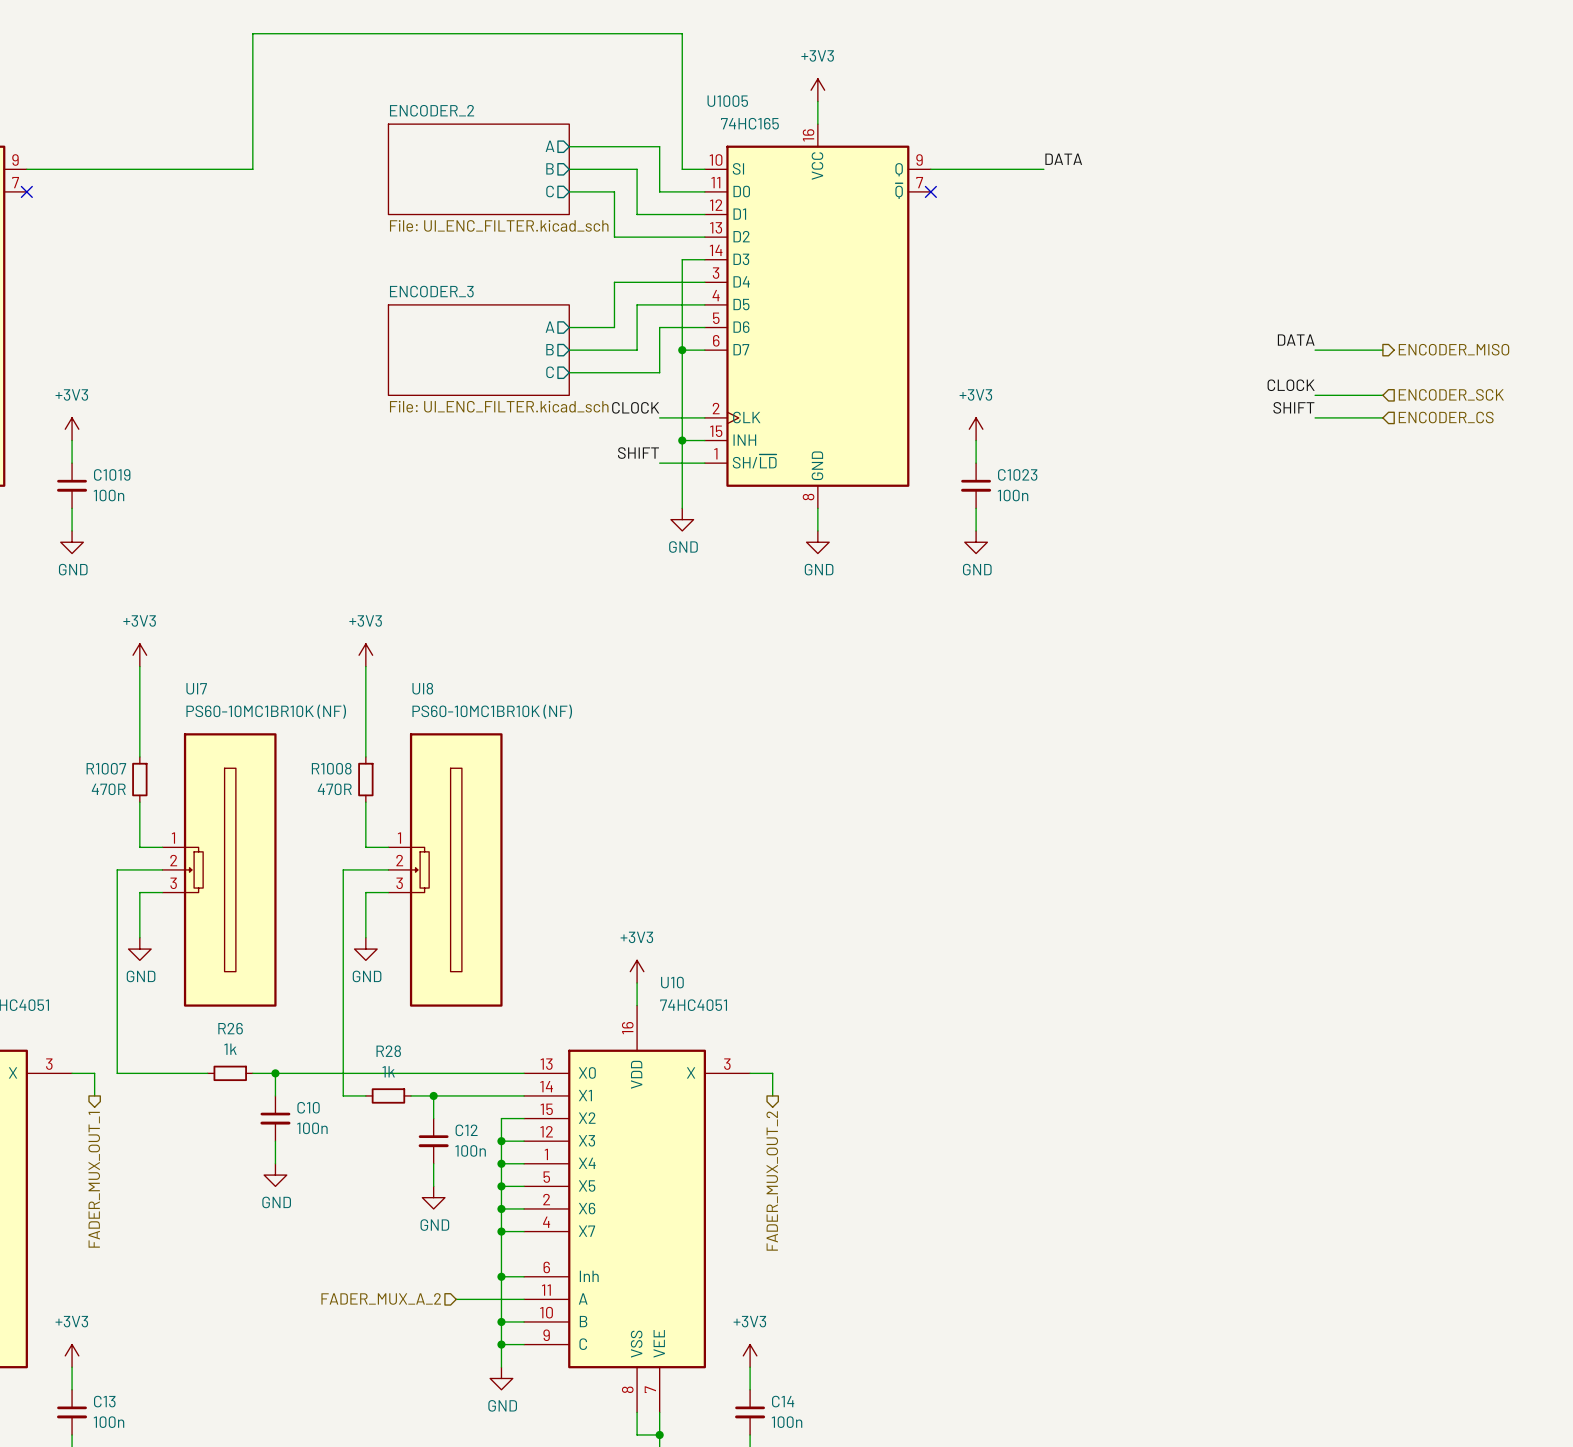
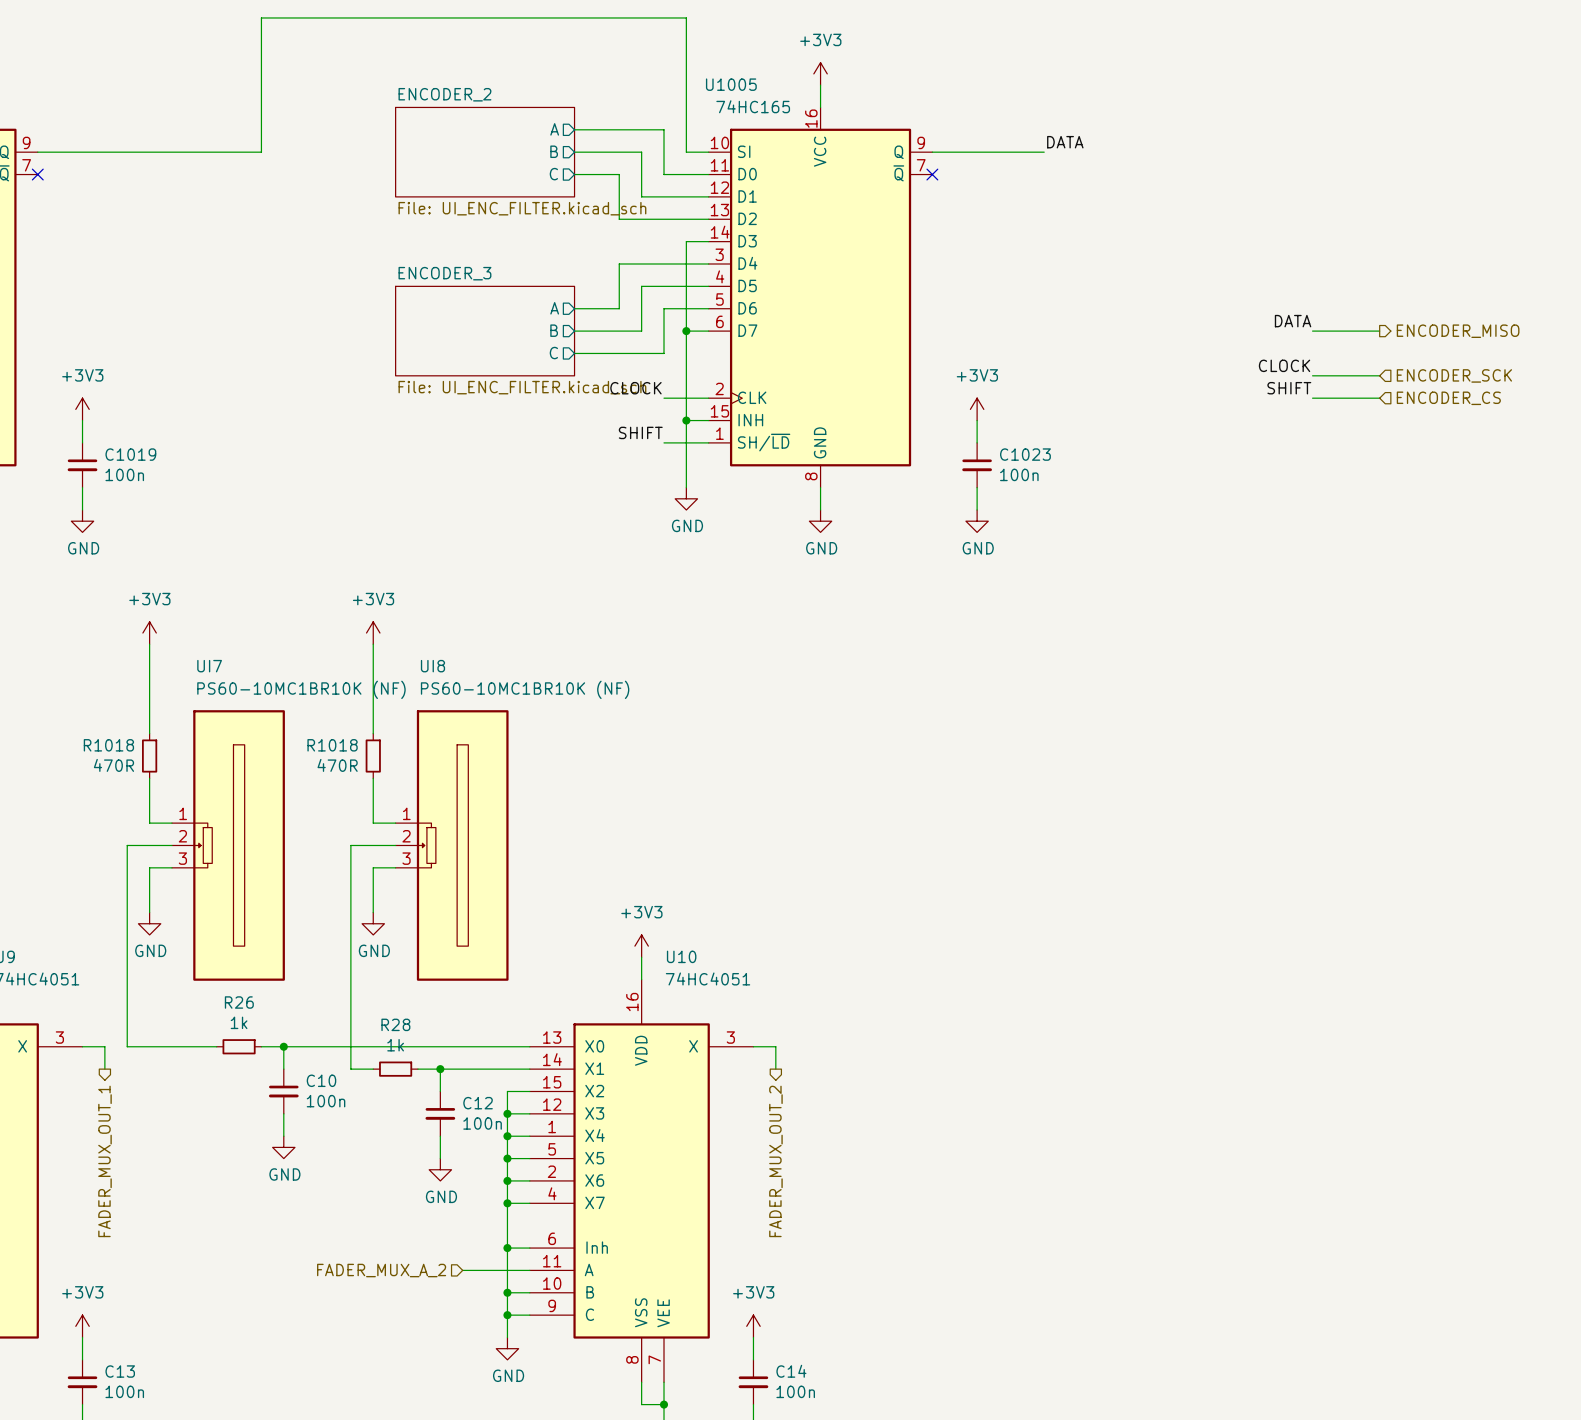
R1007 name: R1007 (106, 768) -> R1018 (108, 745)
R1008 name: R1008 (331, 768) -> R1018 (332, 745)

